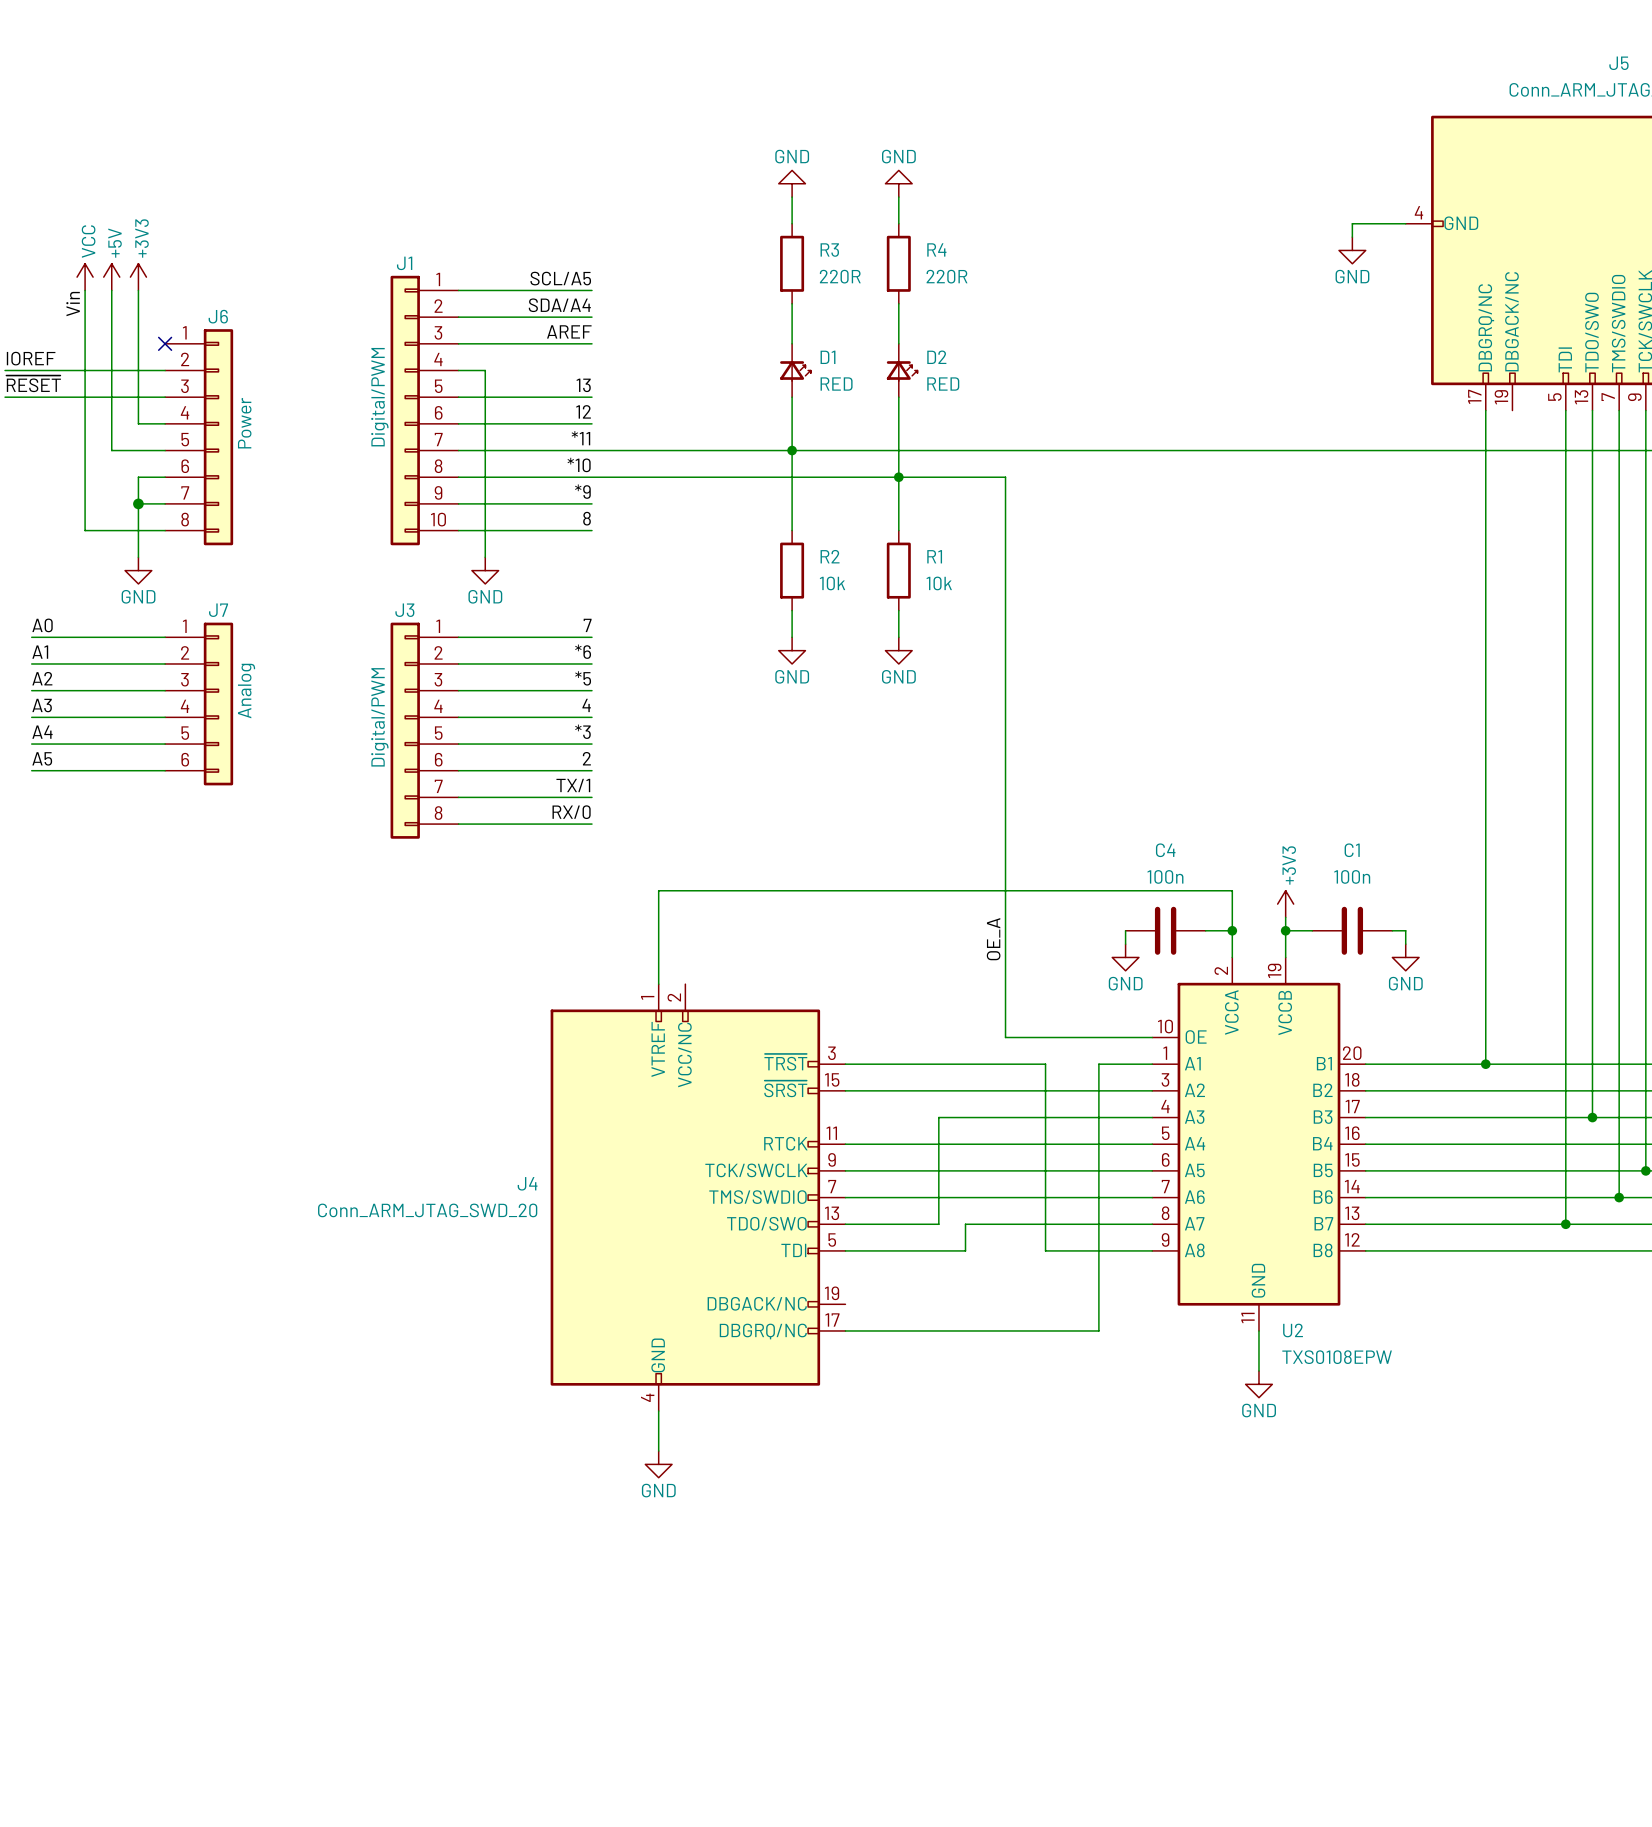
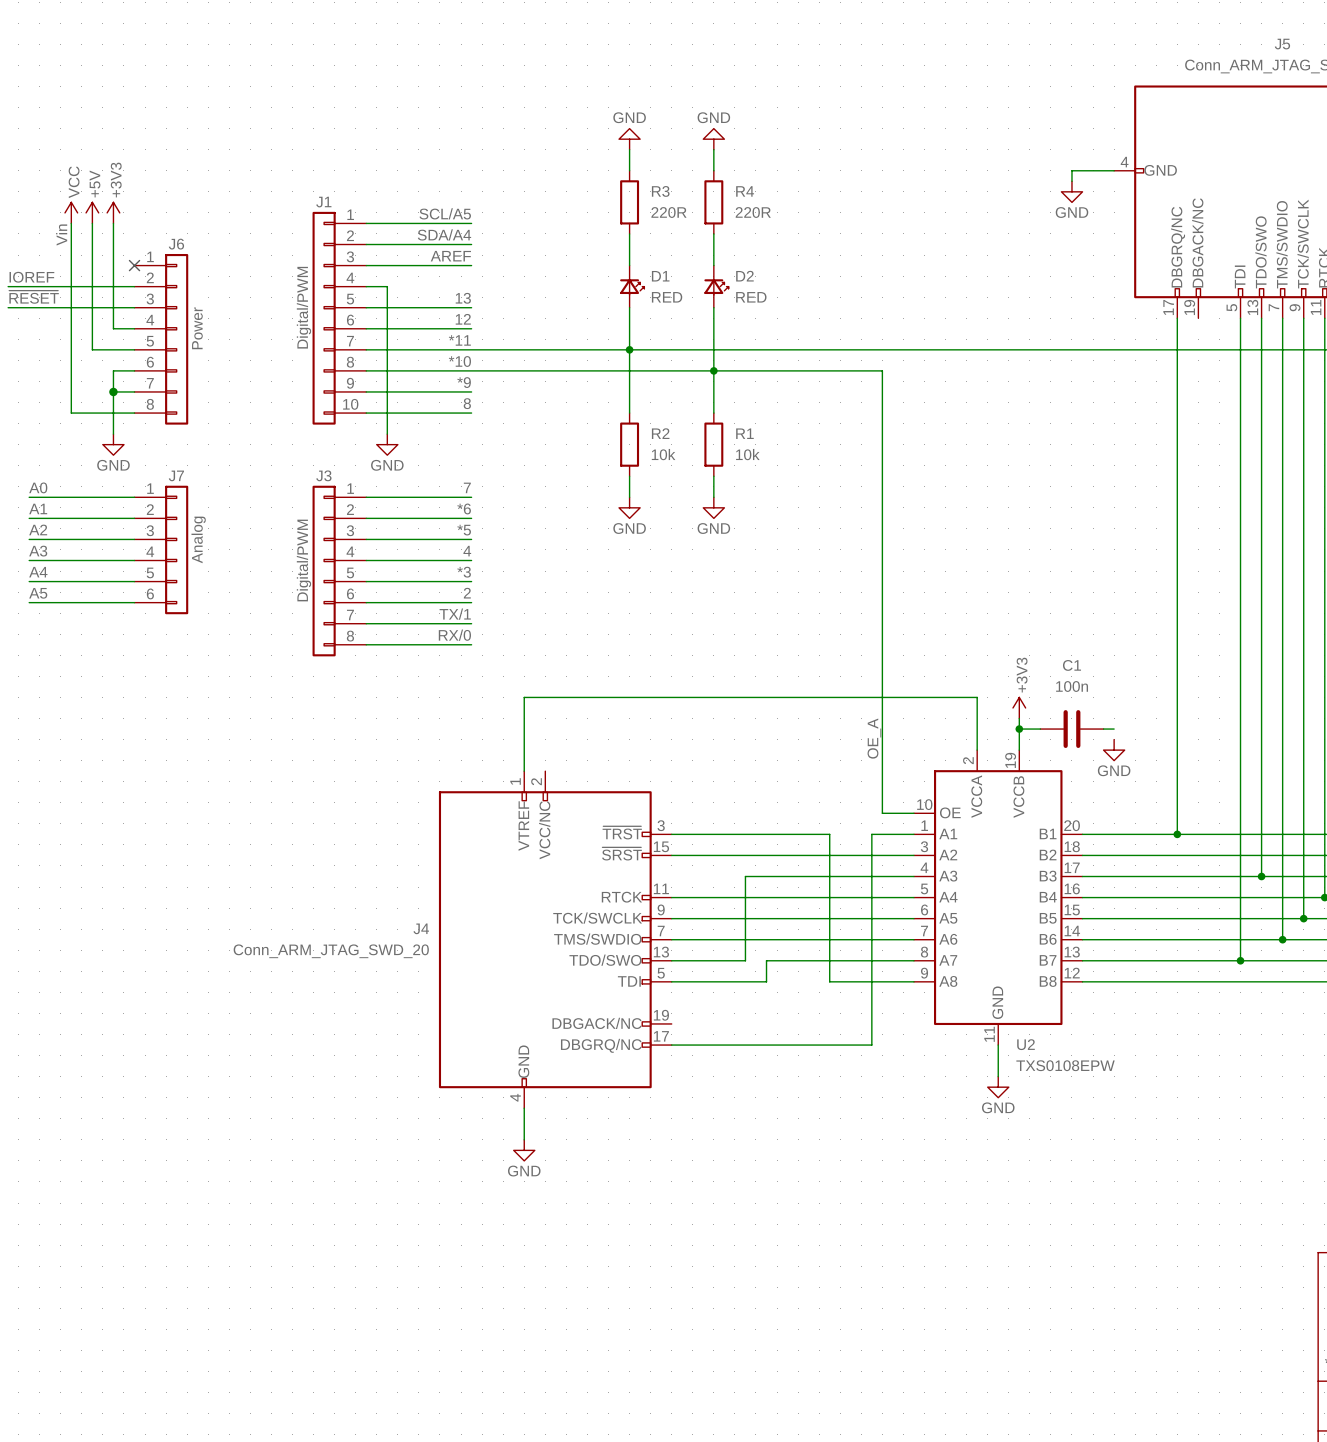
wire: (1005, 477) (1005, 1037) (1112, 1037) -> (798, 370) (882, 370) (882, 813)
wire: (1125, 930) (1125, 944) -> none
C4: 100n (1165, 930) -> none
wire: (1205, 930) (1232, 930) -> none
junction: (1232, 930) -> none
wire: (1405, 930) (1405, 944) -> none
label position: OE_A (993, 939) -> OE_A (874, 738)
power symbol: GND (1125, 957) -> none

